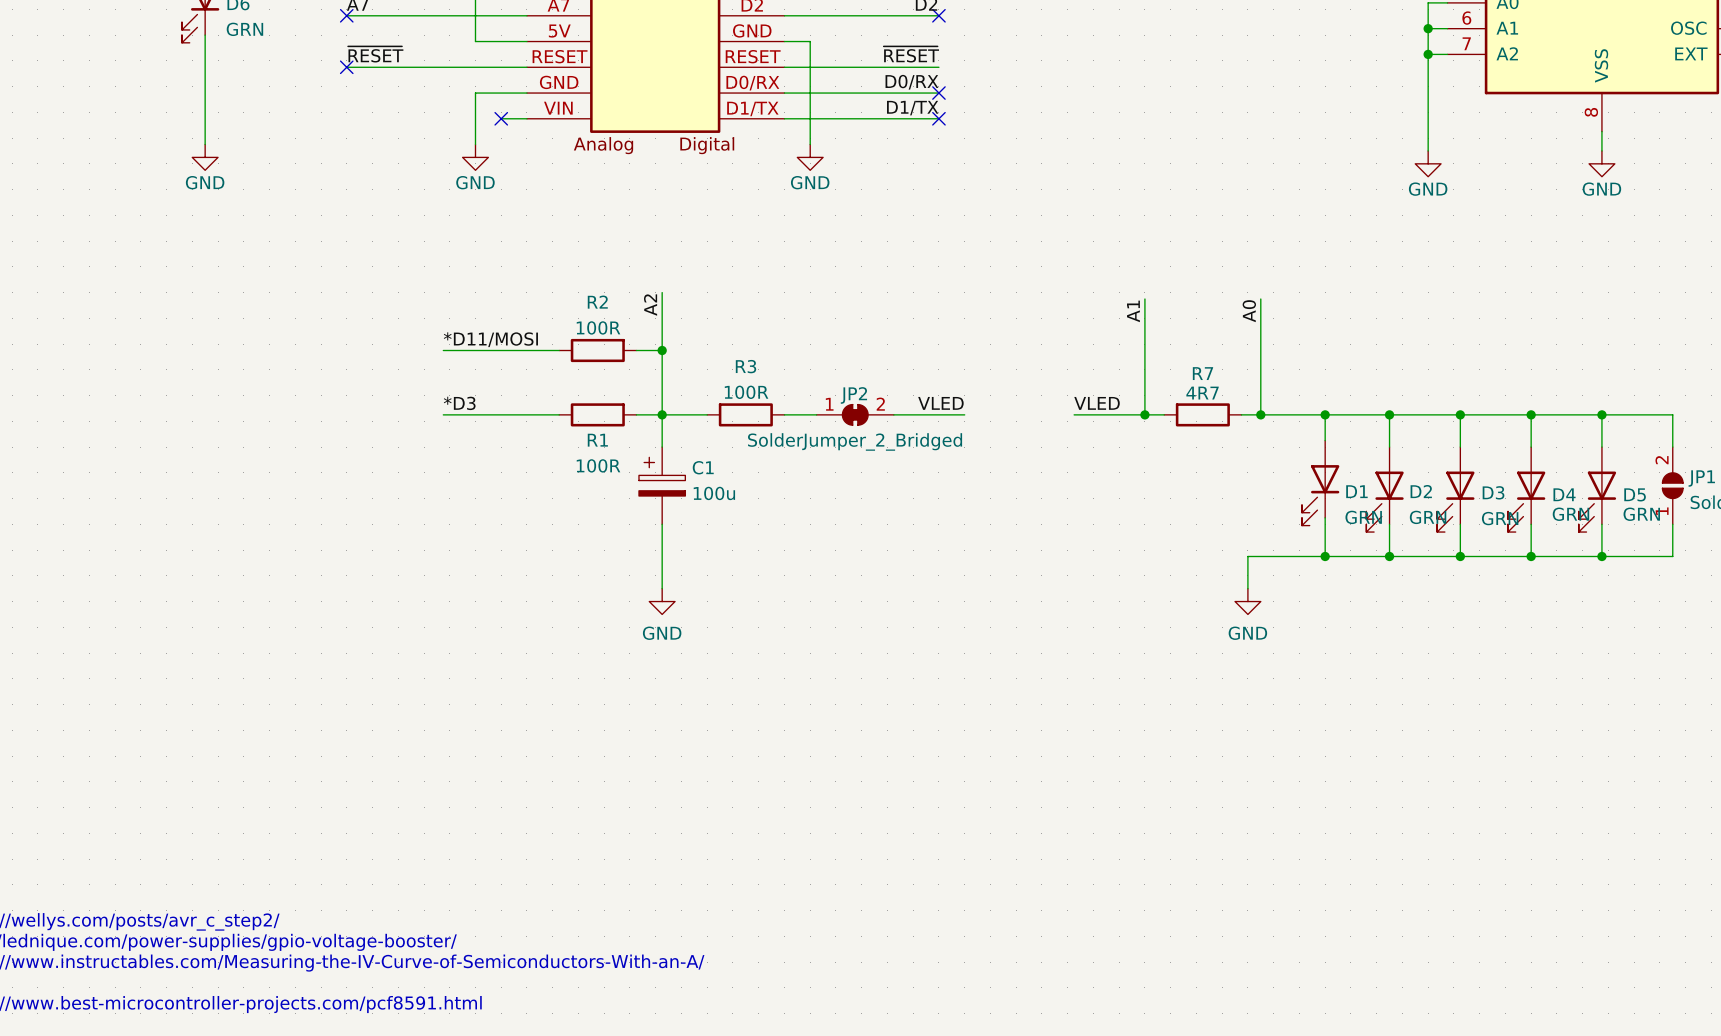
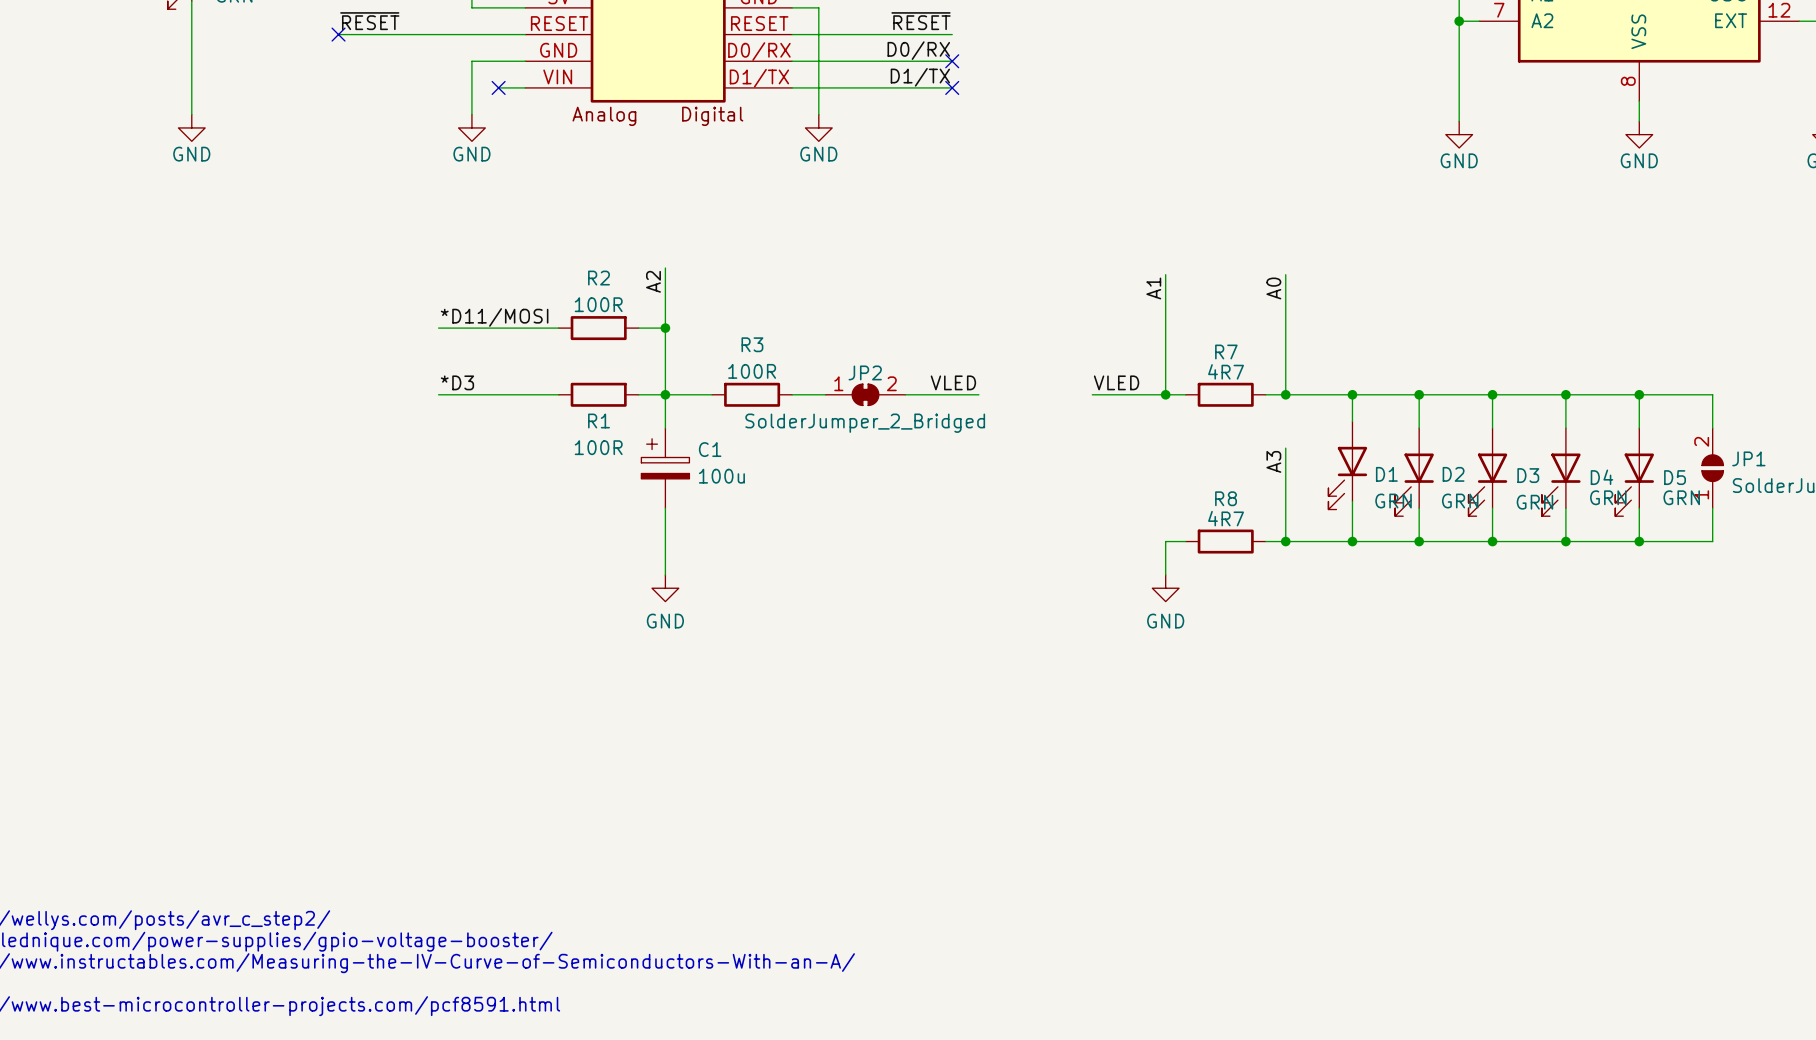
wire: none -> (1285, 448) (1285, 541)
label: none -> A3 (1273, 461)
wire: none -> (1185, 541) (1165, 541) (1165, 574)
R8: none -> 4R7 (1225, 541)
wire: (1247, 556) (1247, 588) -> (1272, 541) (1265, 541)
junction: none -> (1285, 541)
power symbol position: GND (1247, 601) -> GND (1165, 588)

